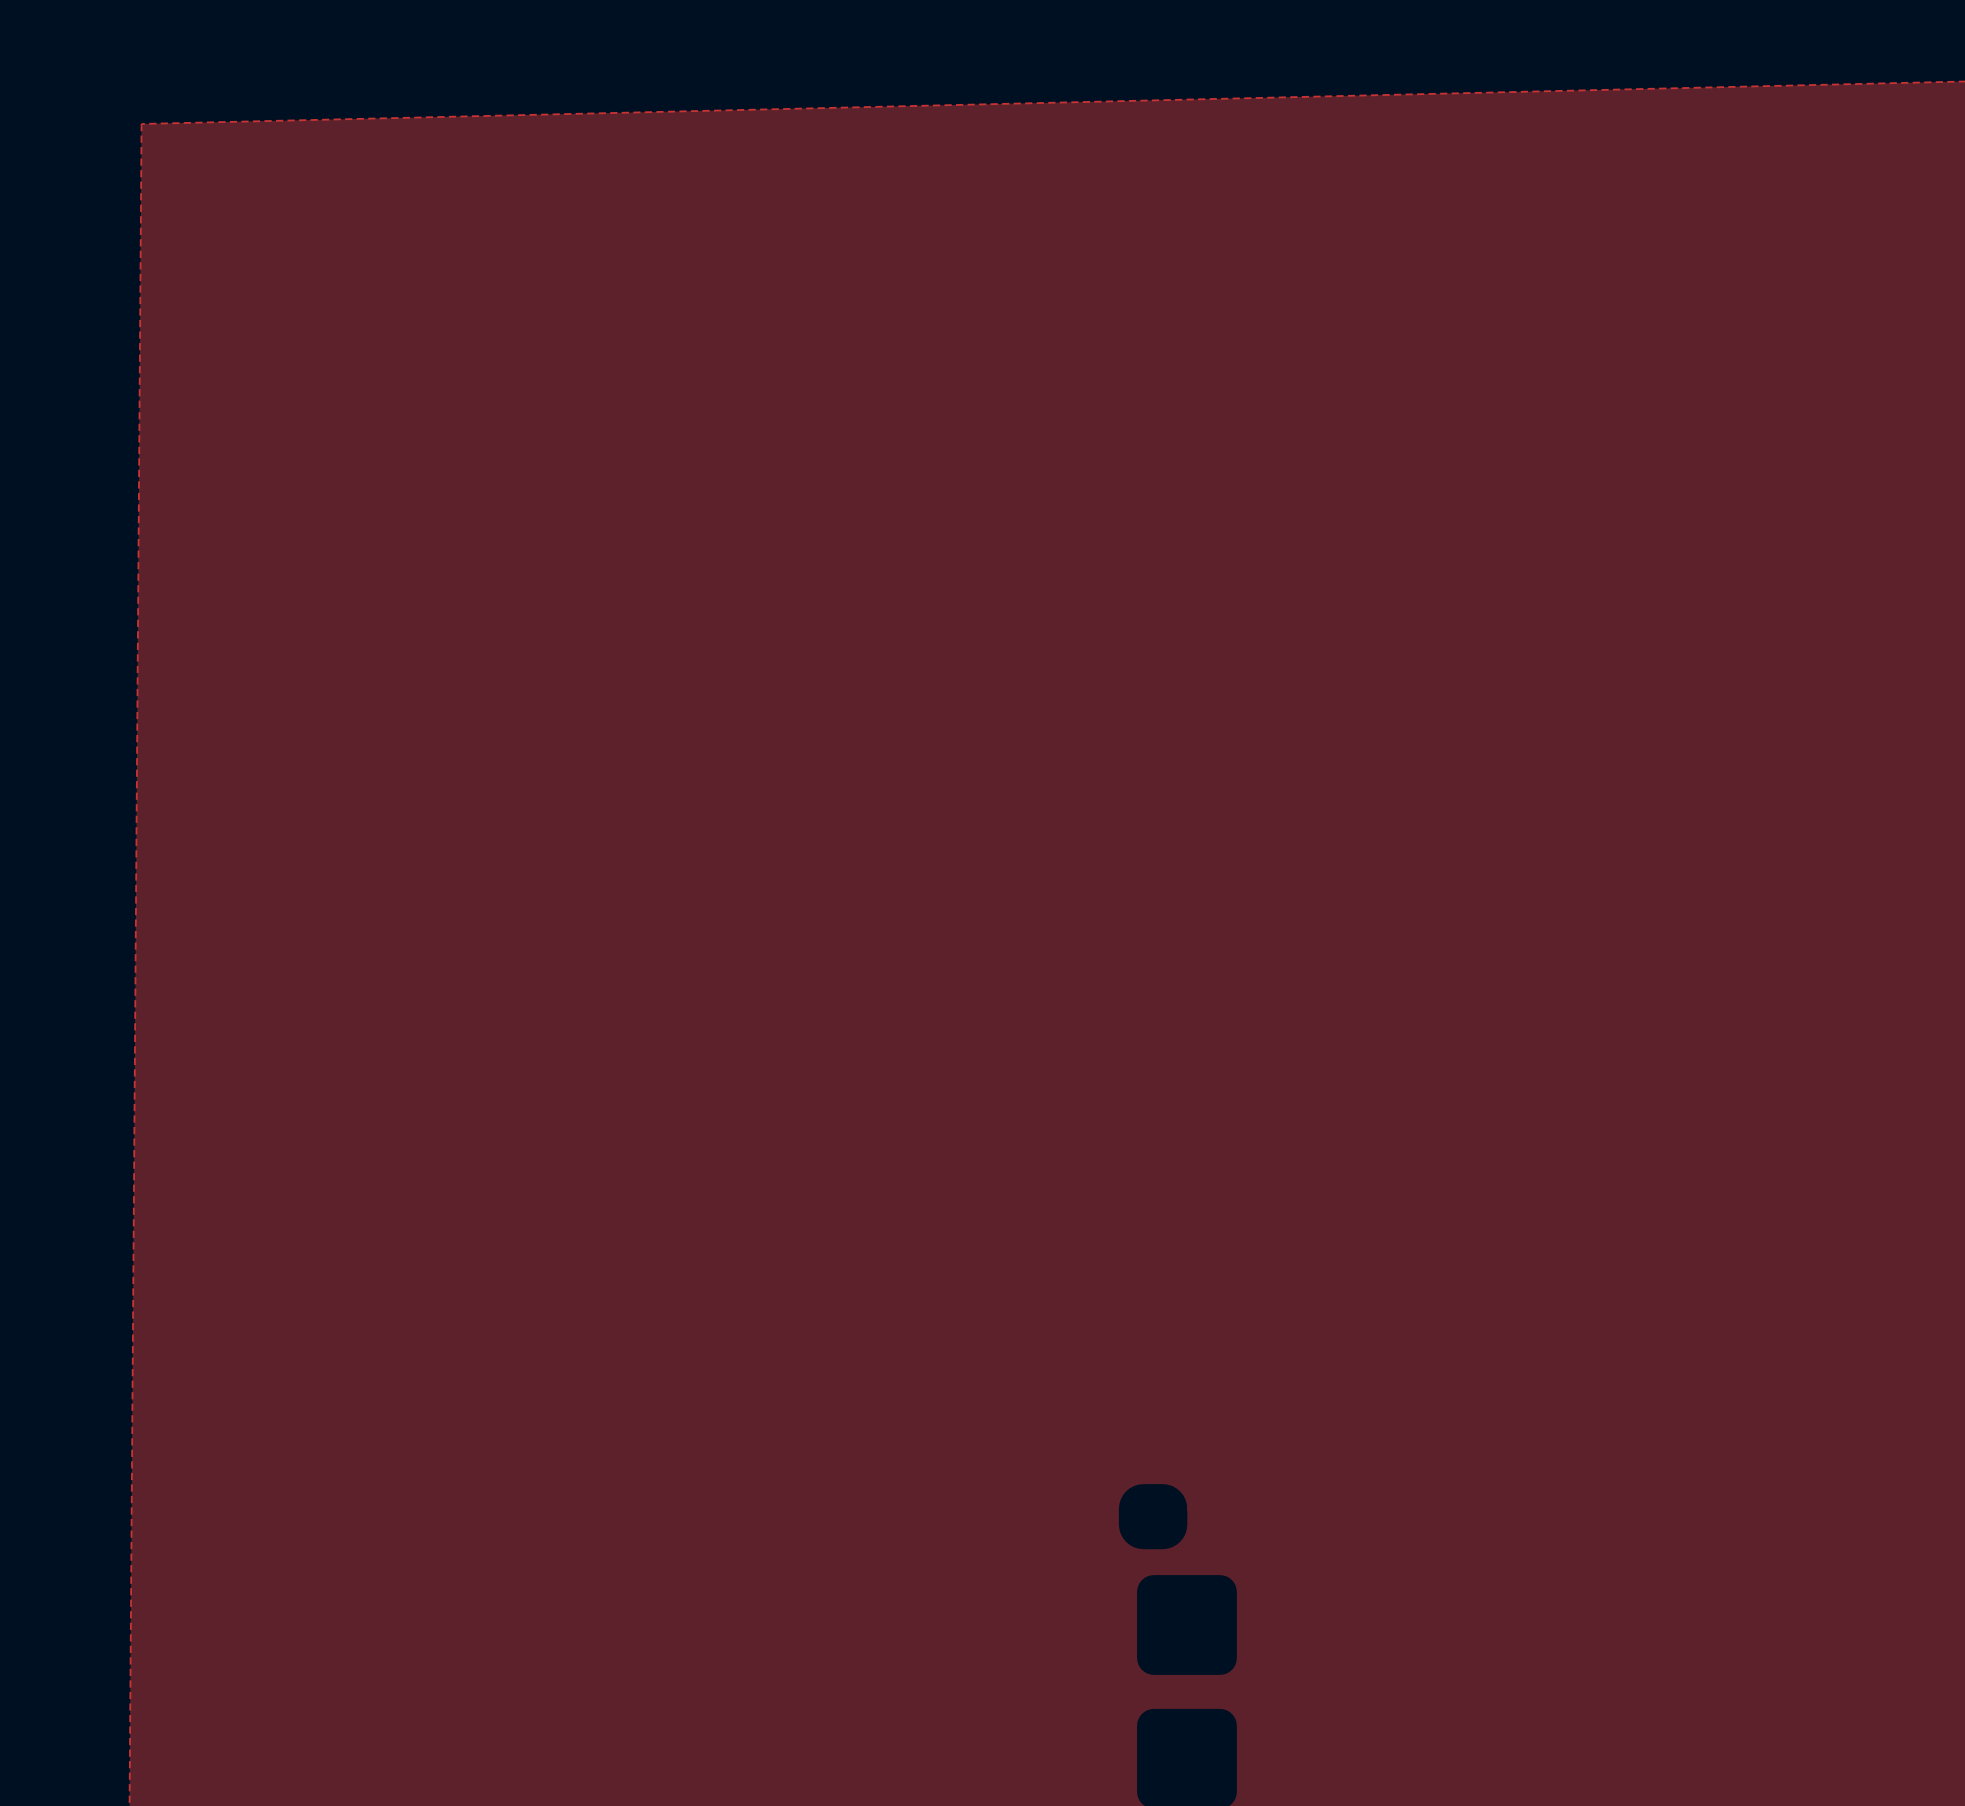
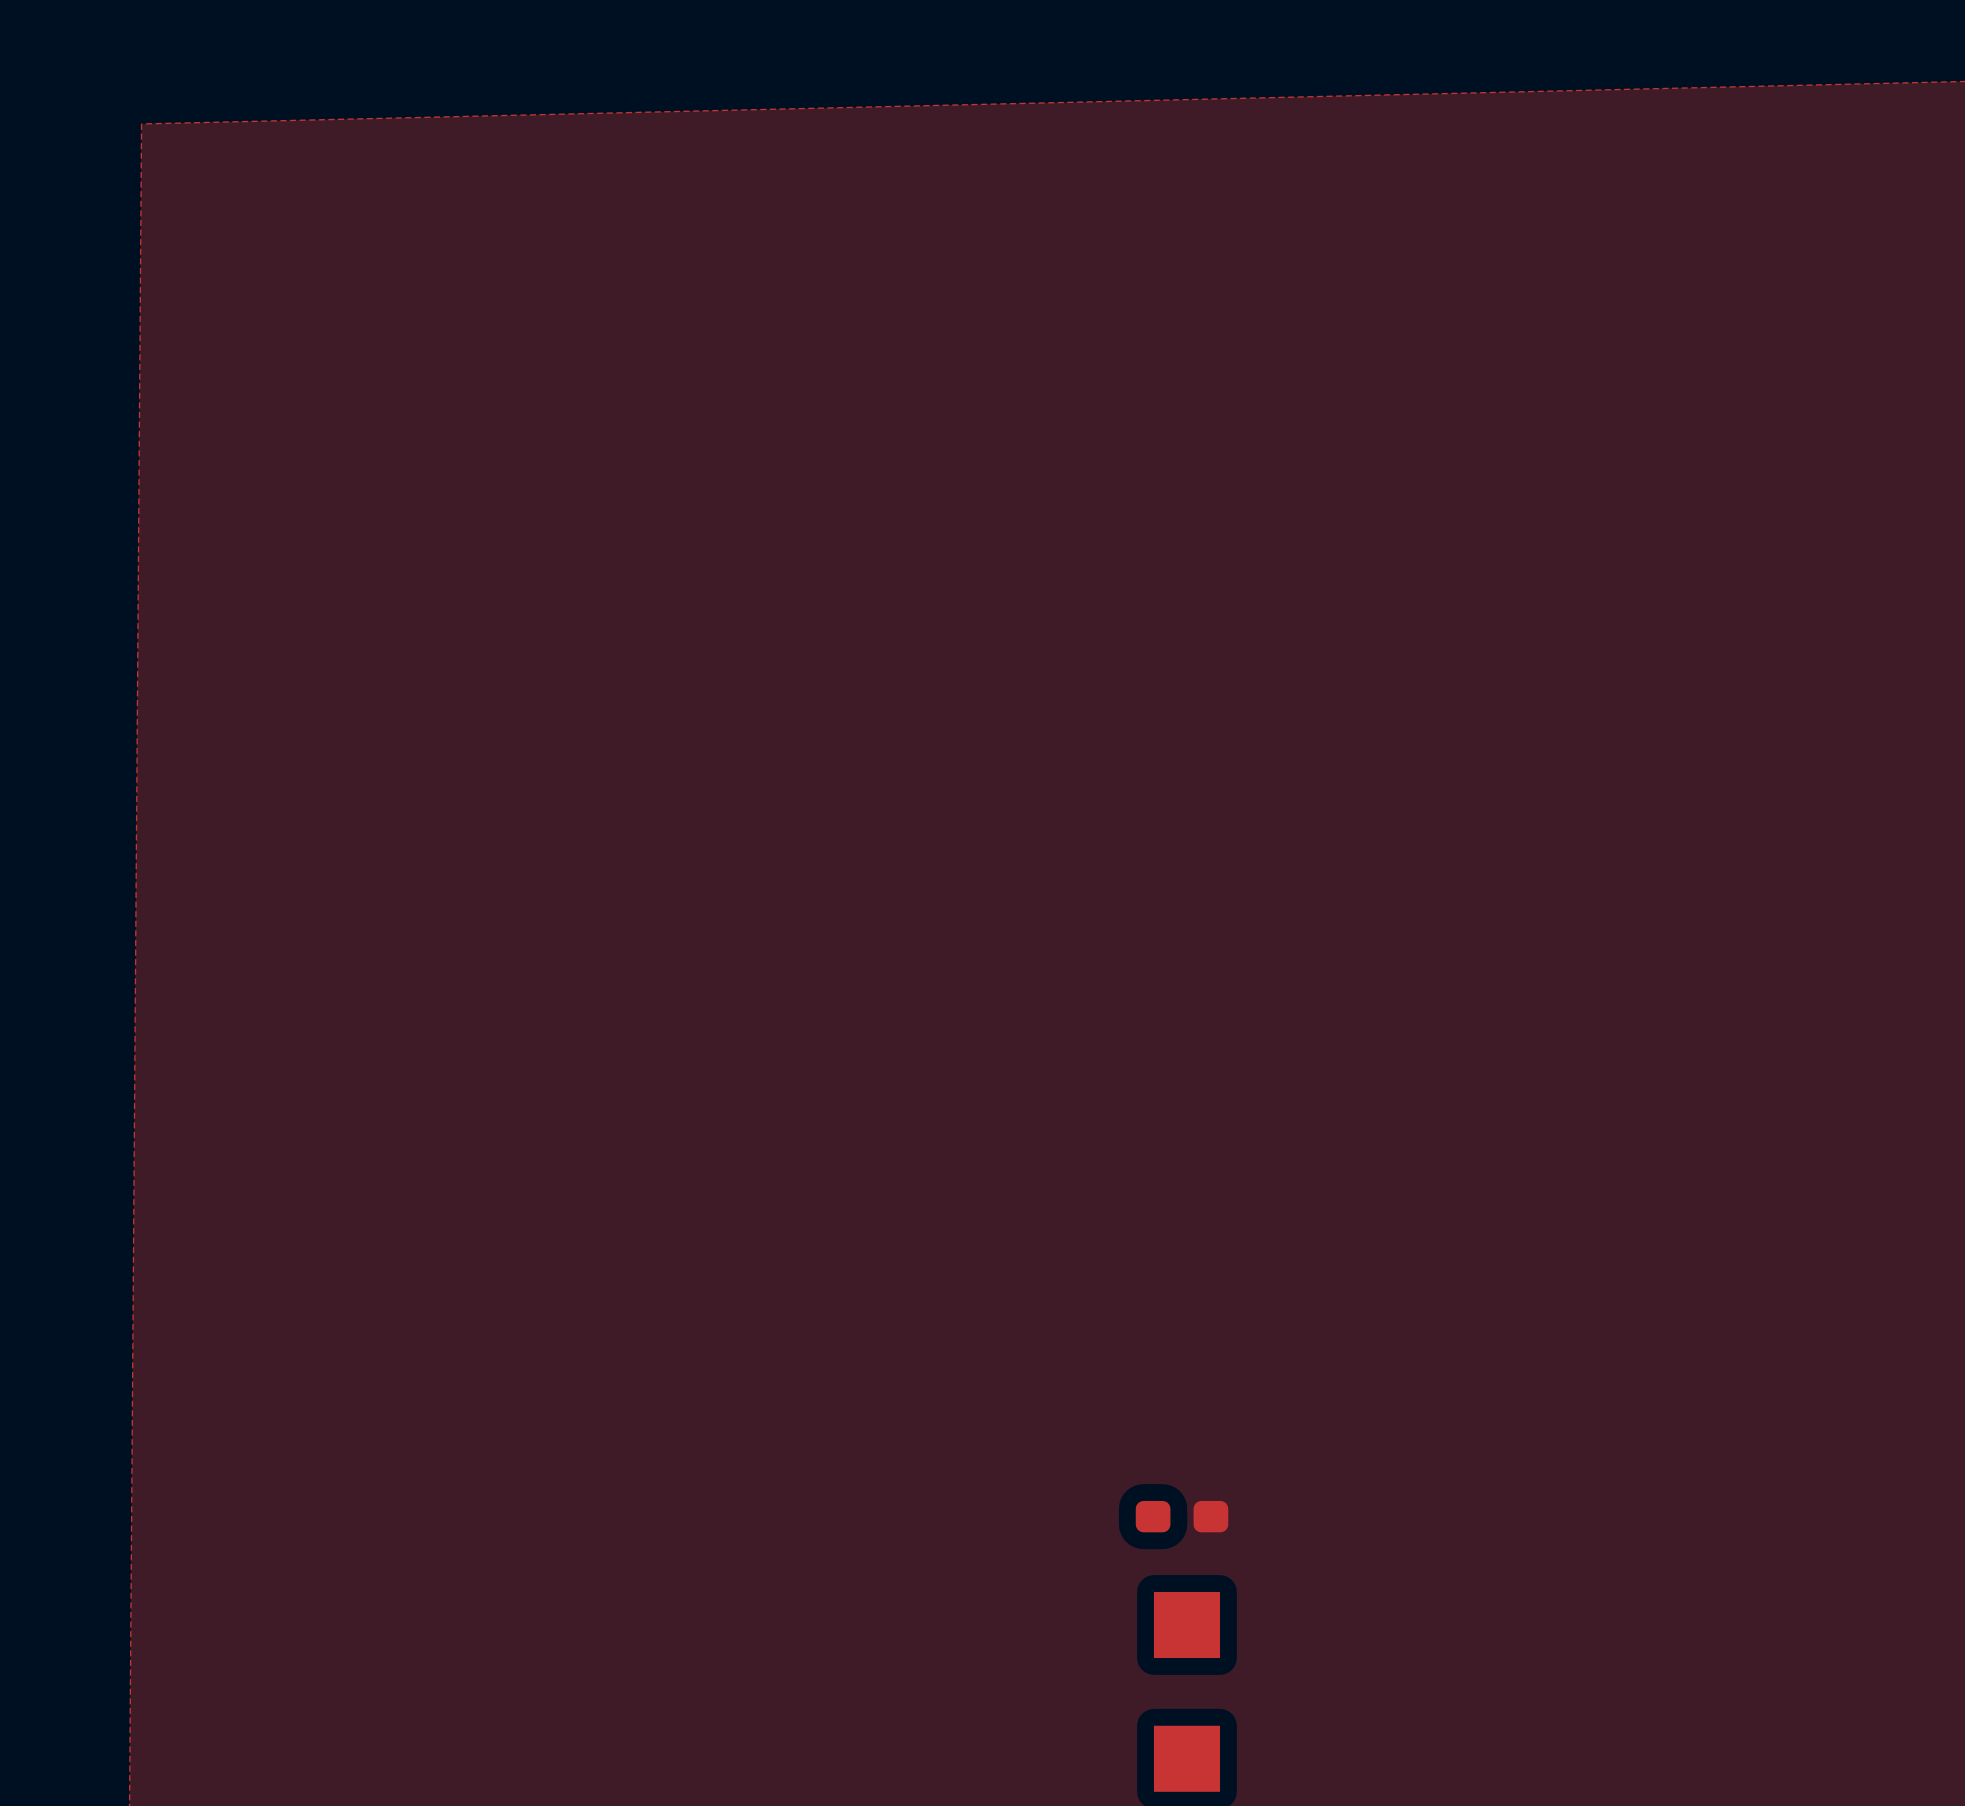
part: none -> (1182, 1516)
part: none -> (1186, 1624)
part: none -> (1186, 1758)

